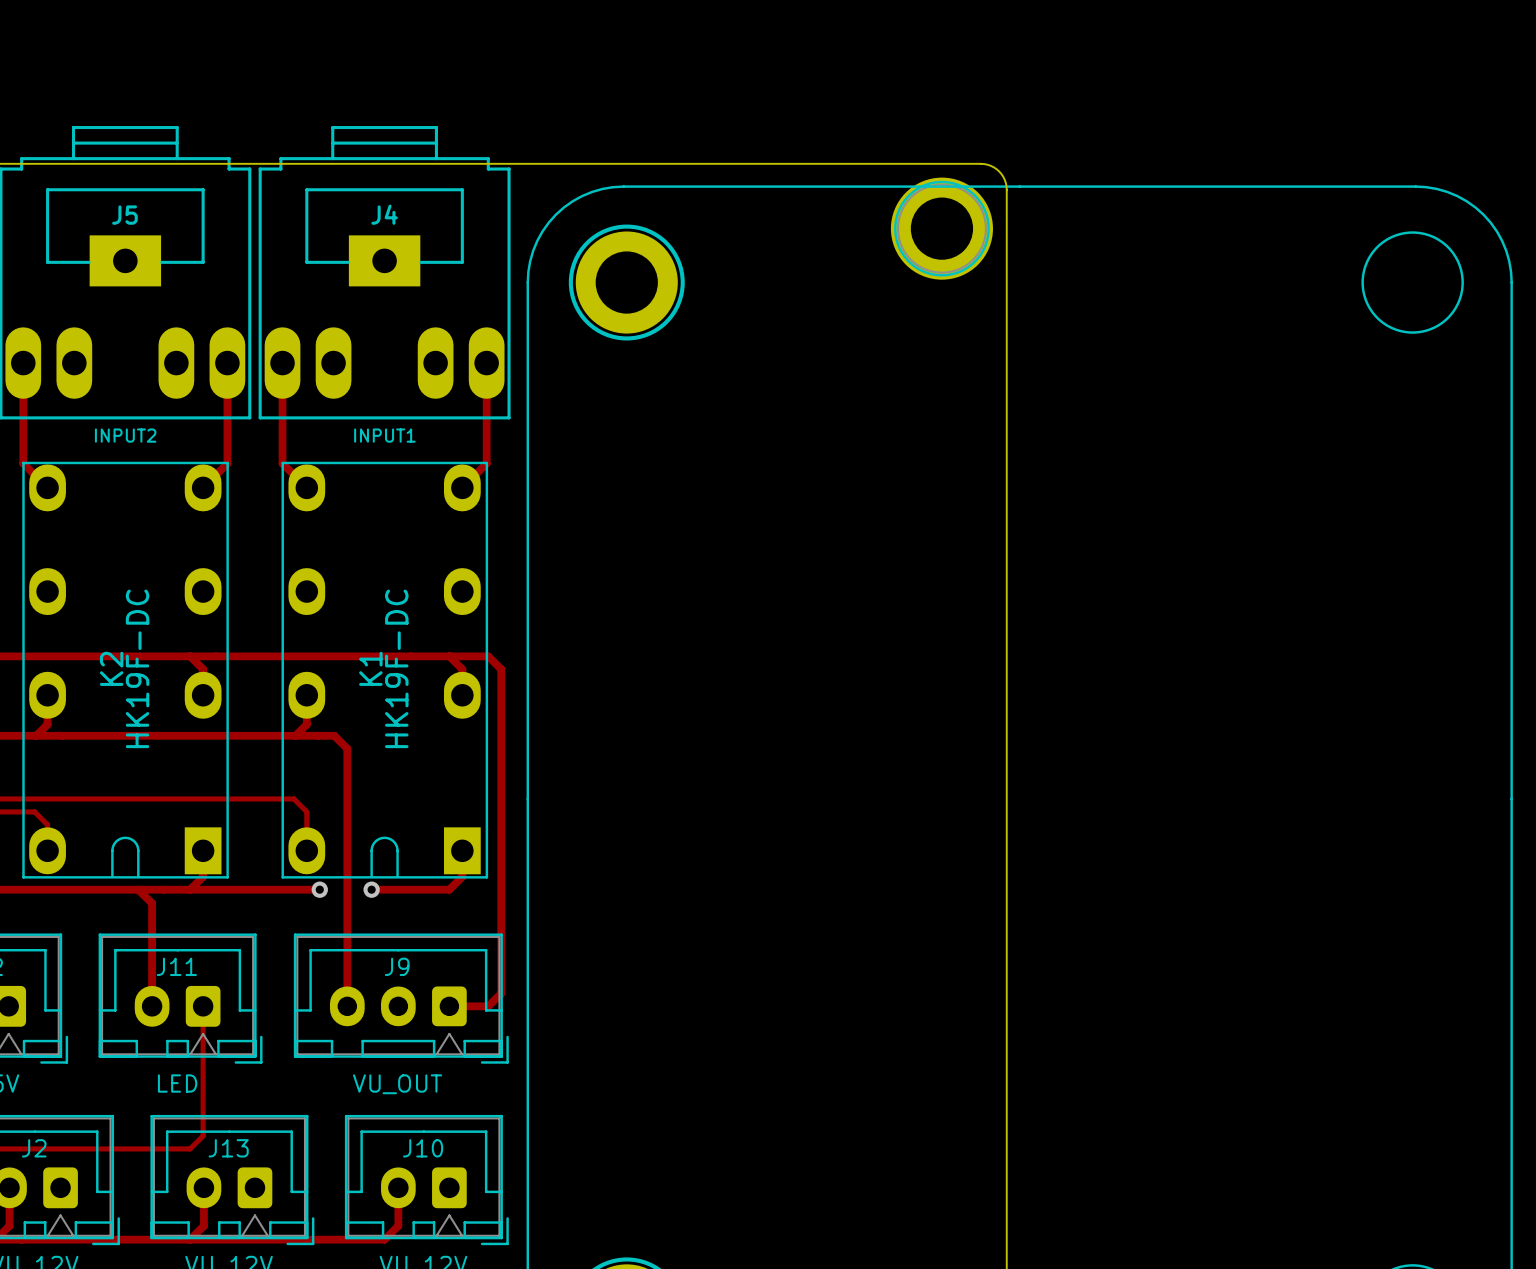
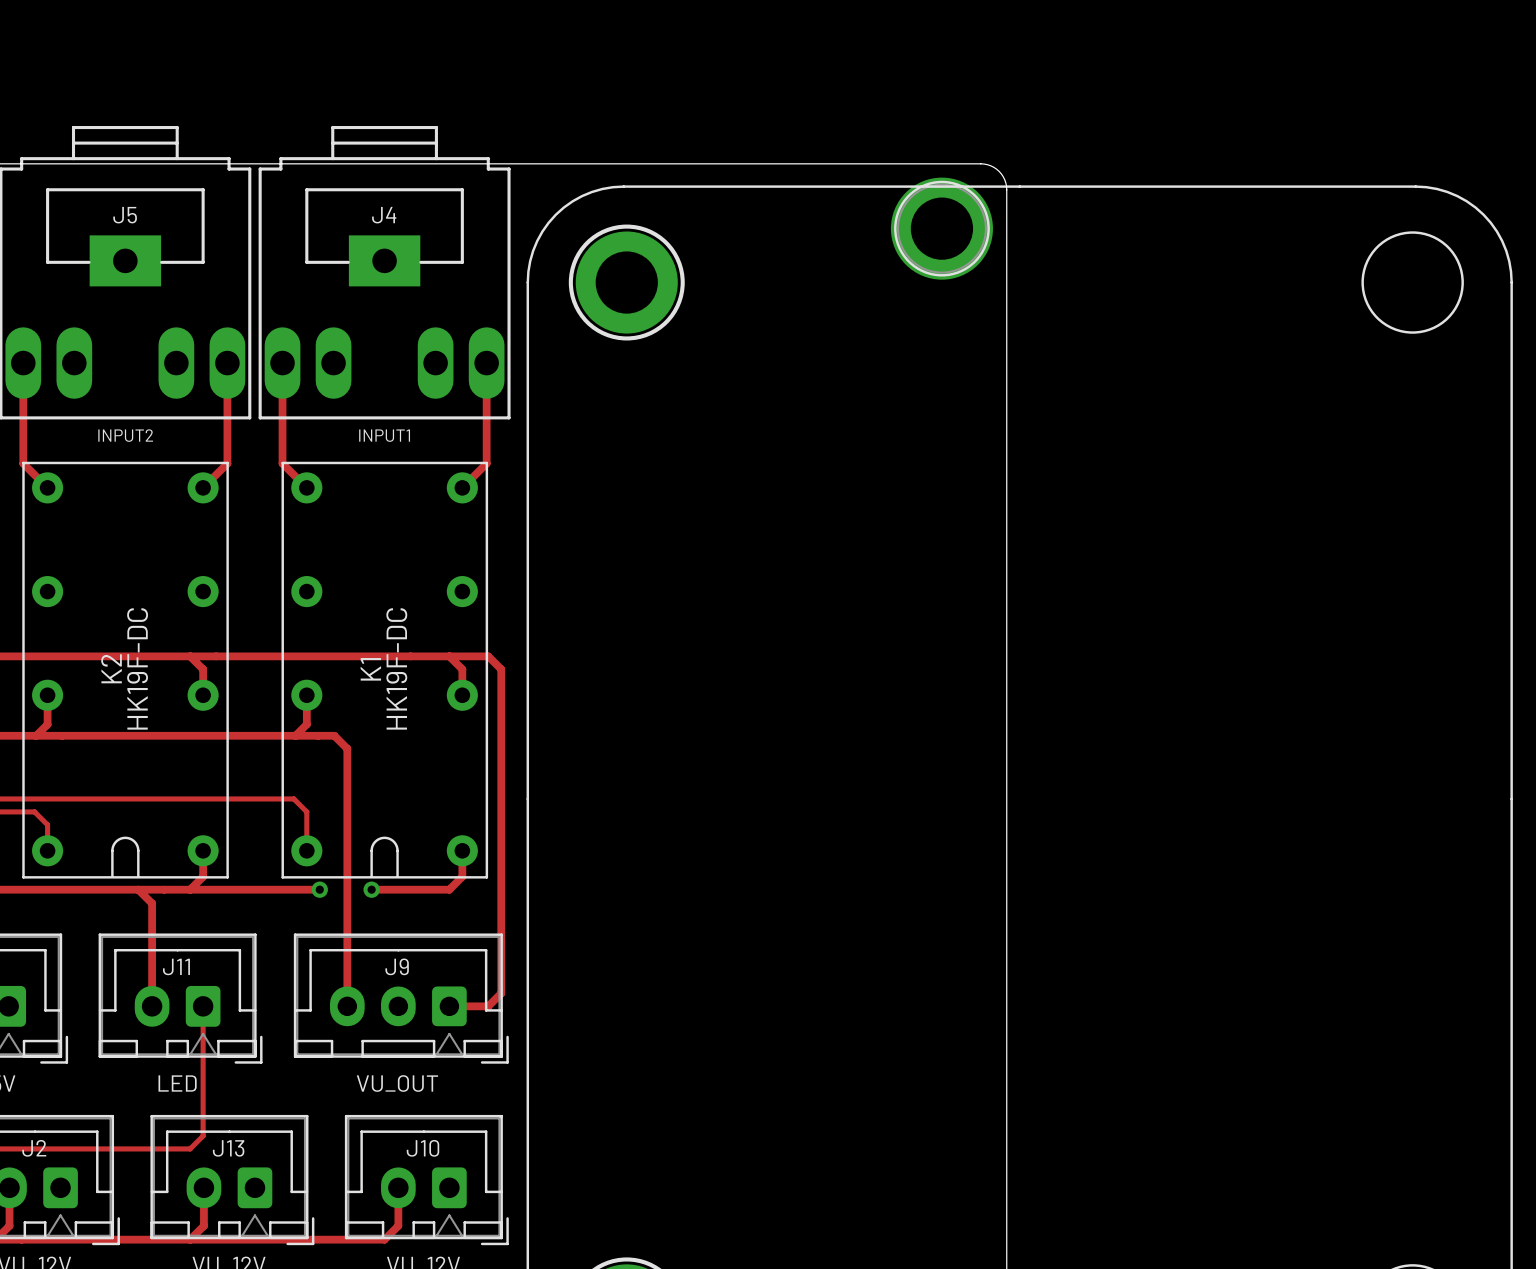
K2 footprint: [22, 461, 229, 879] -> [22, 461, 229, 879]
K1 footprint: [281, 461, 489, 879] -> [281, 461, 489, 879]

